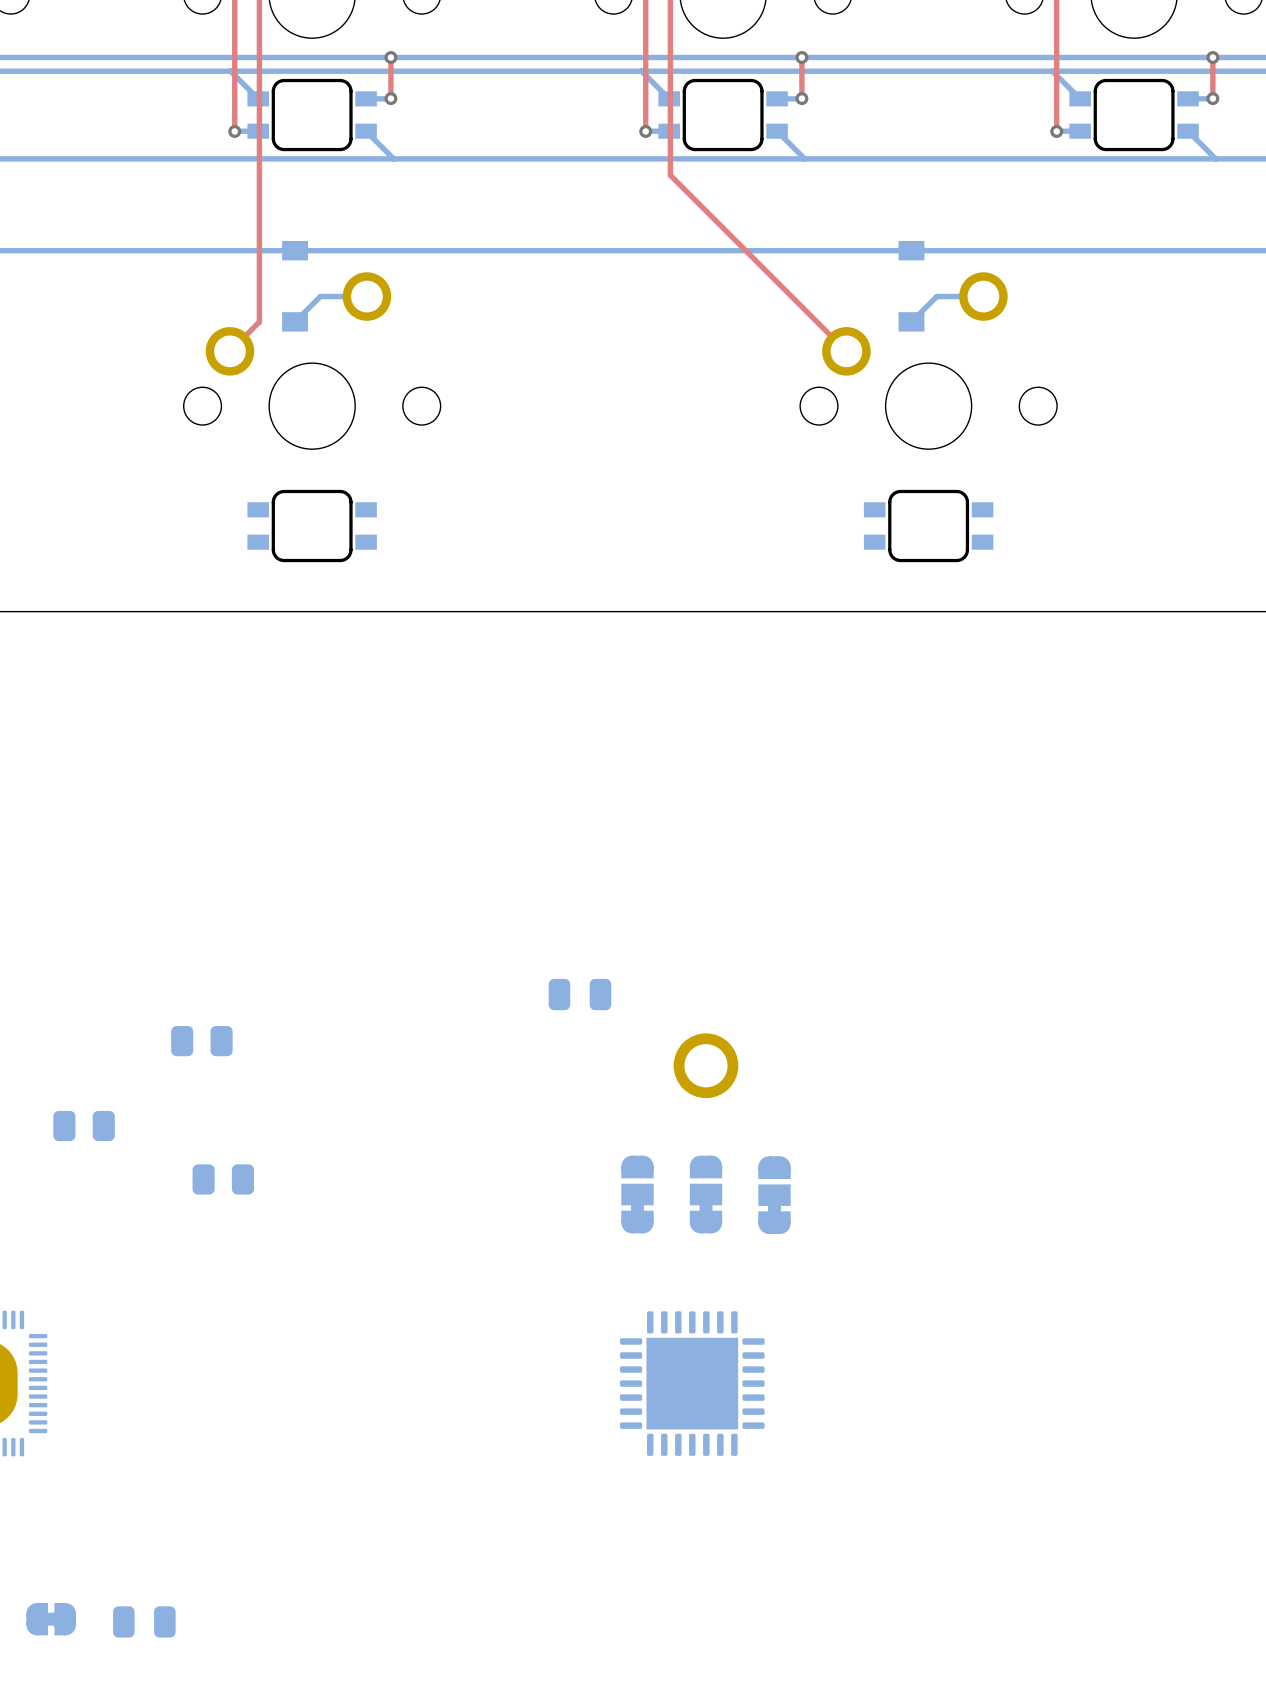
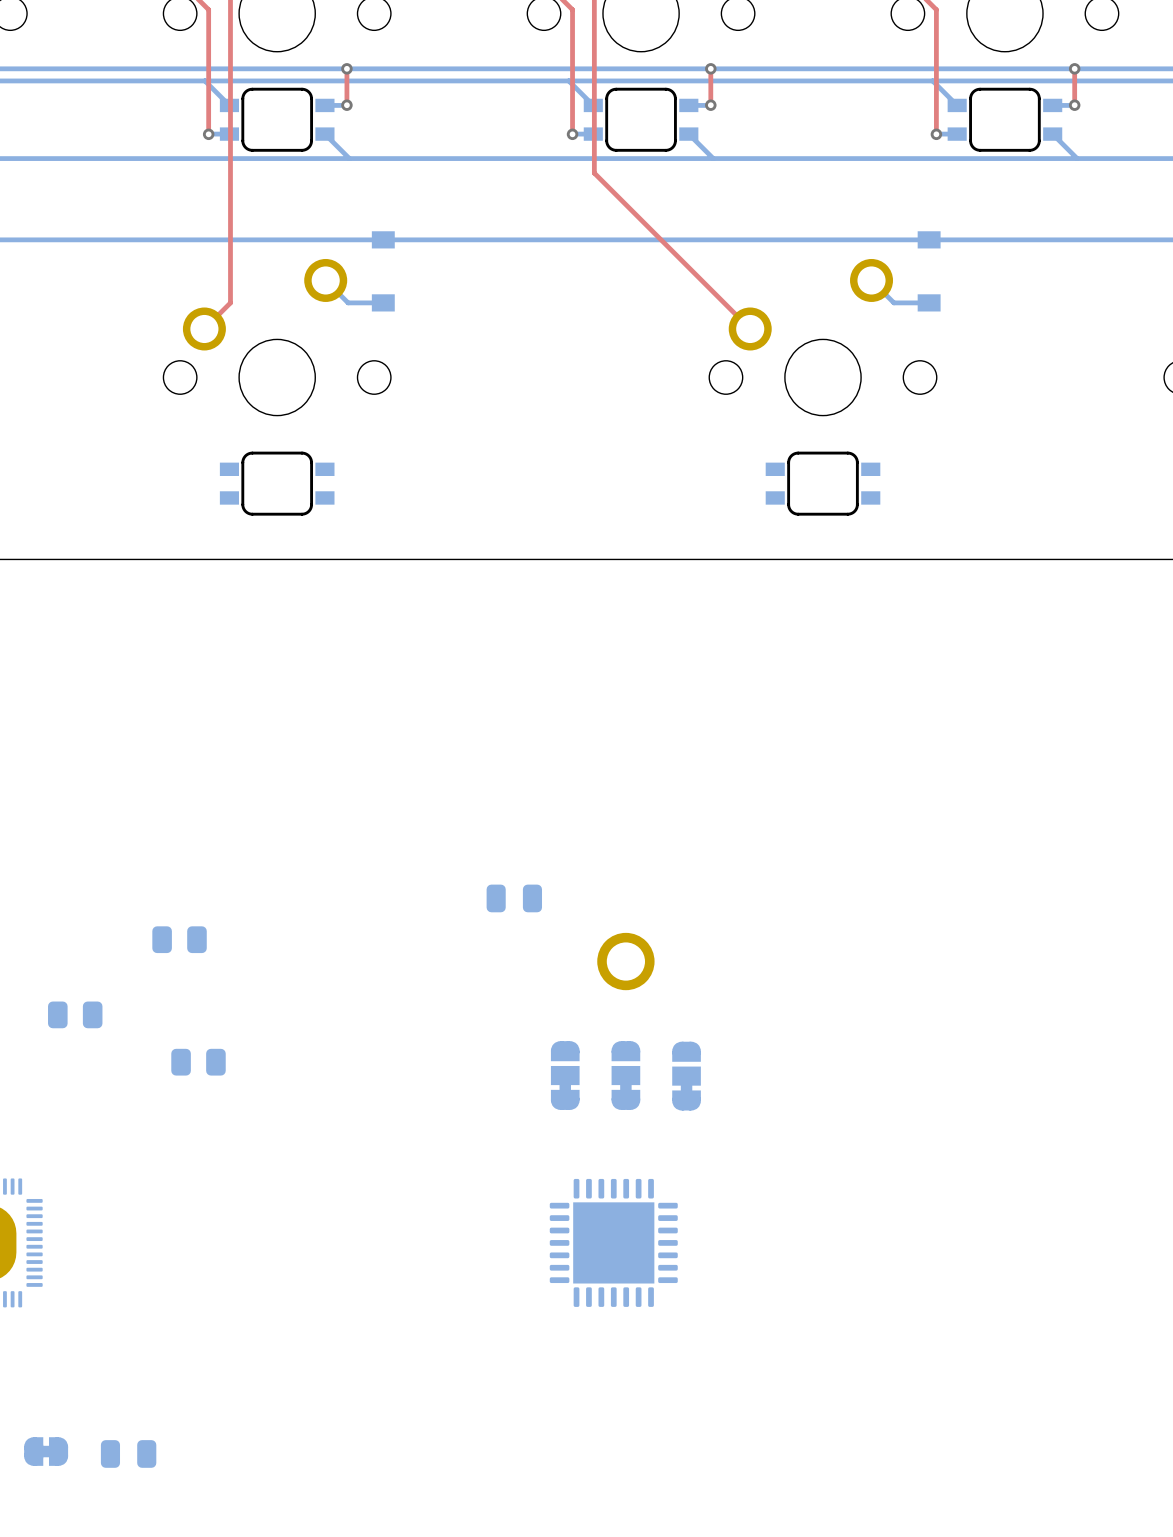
part position: (295, 286) -> (383, 271)
part position: (911, 286) -> (929, 271)
bottom track: (366, 296) (320, 296) (295, 321) -> (325, 280) (348, 302) (383, 302)
bottom track: (983, 296) (936, 296) (911, 321) -> (871, 280) (893, 302) (929, 302)

